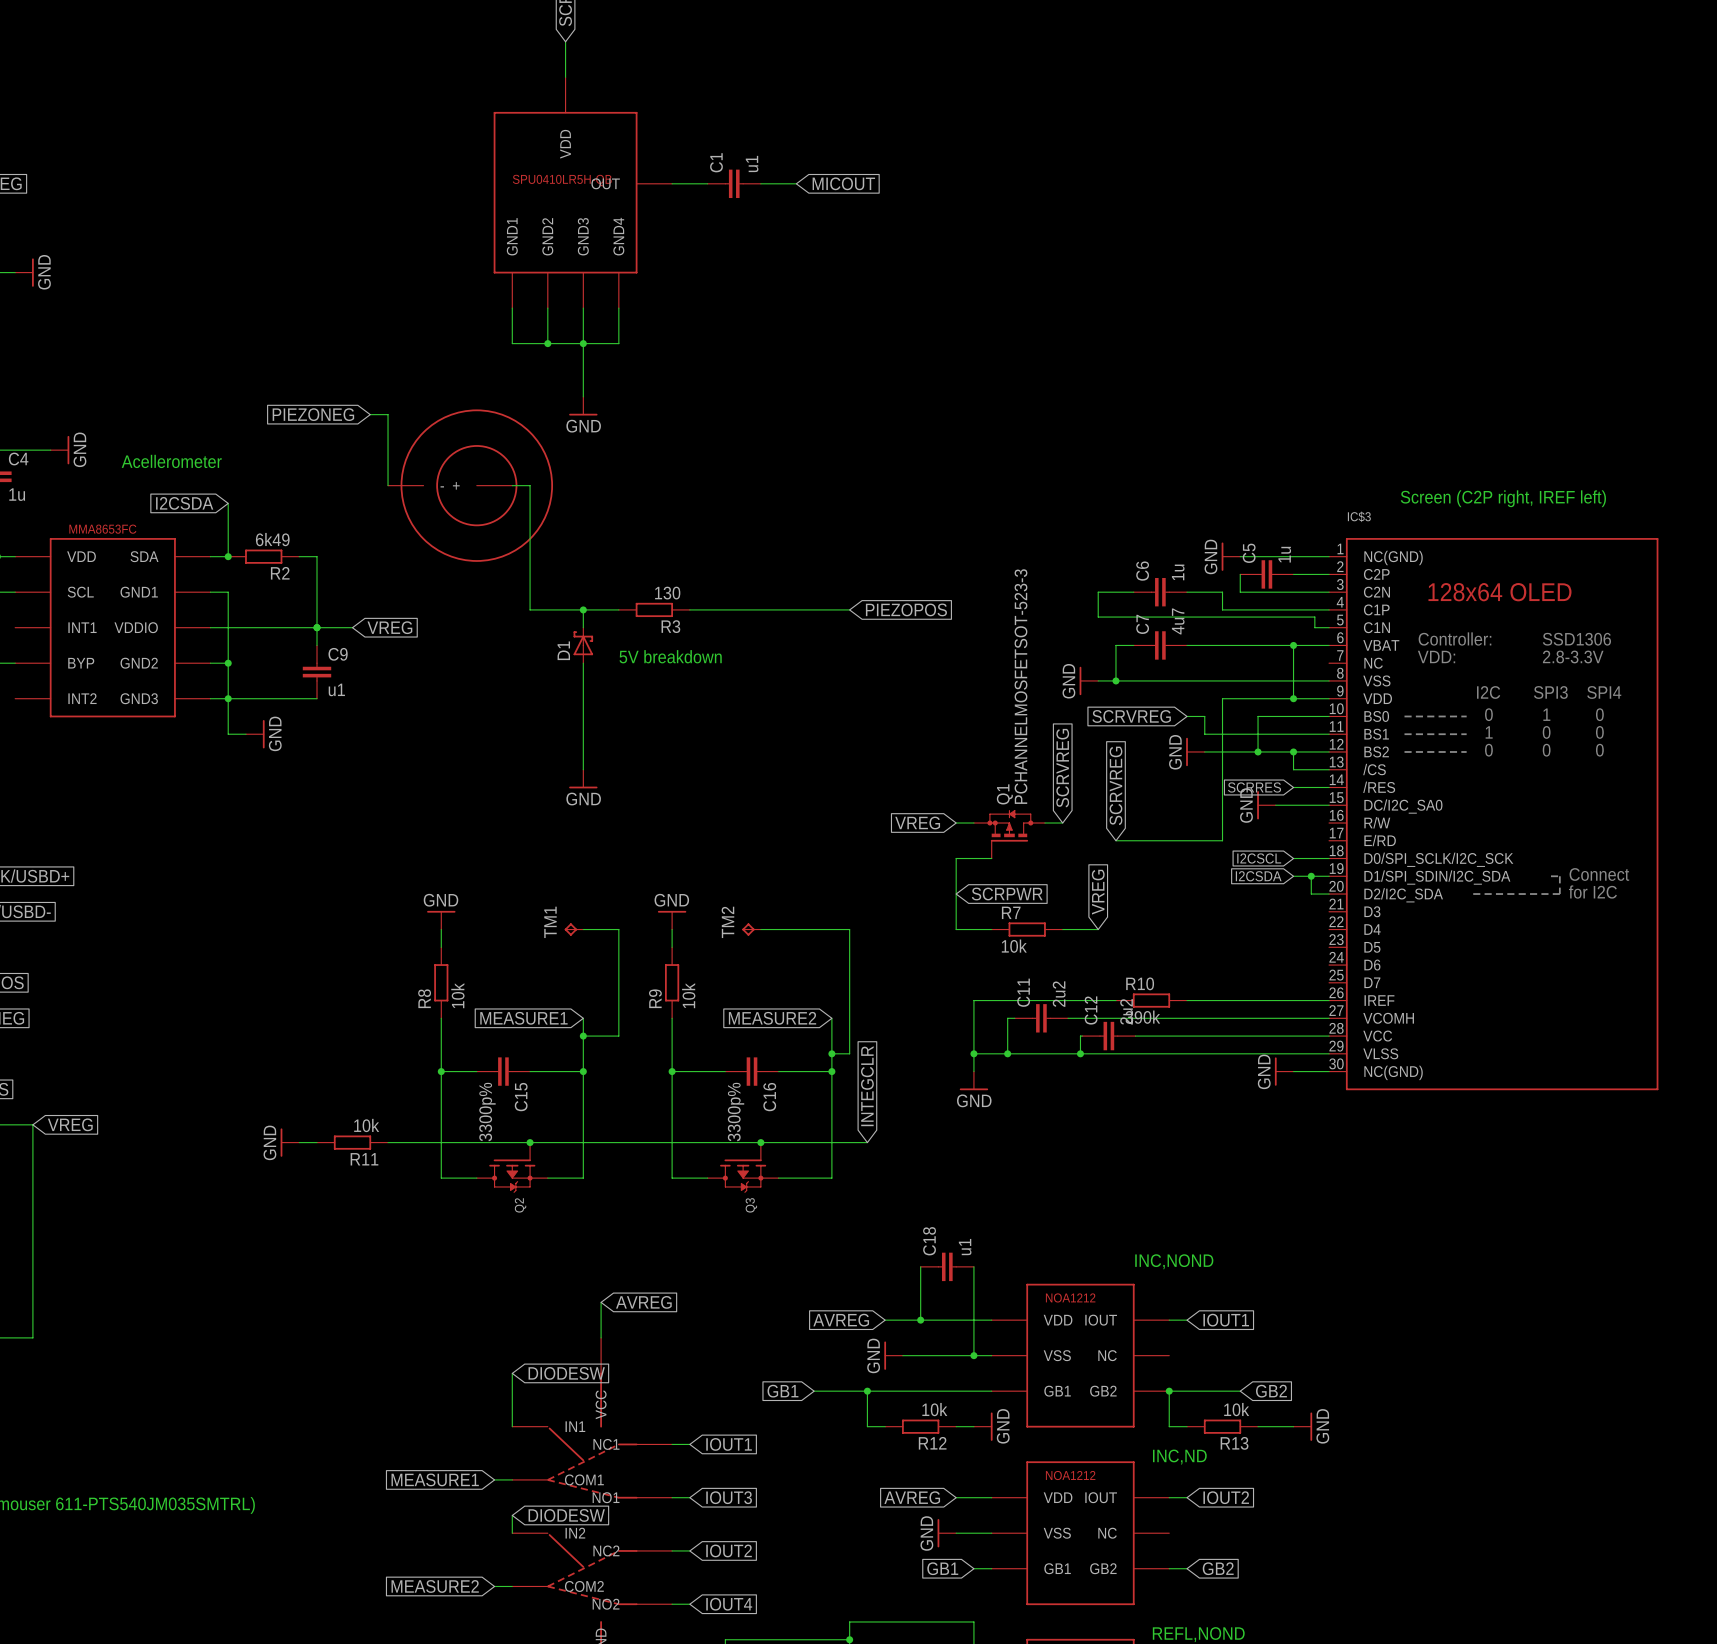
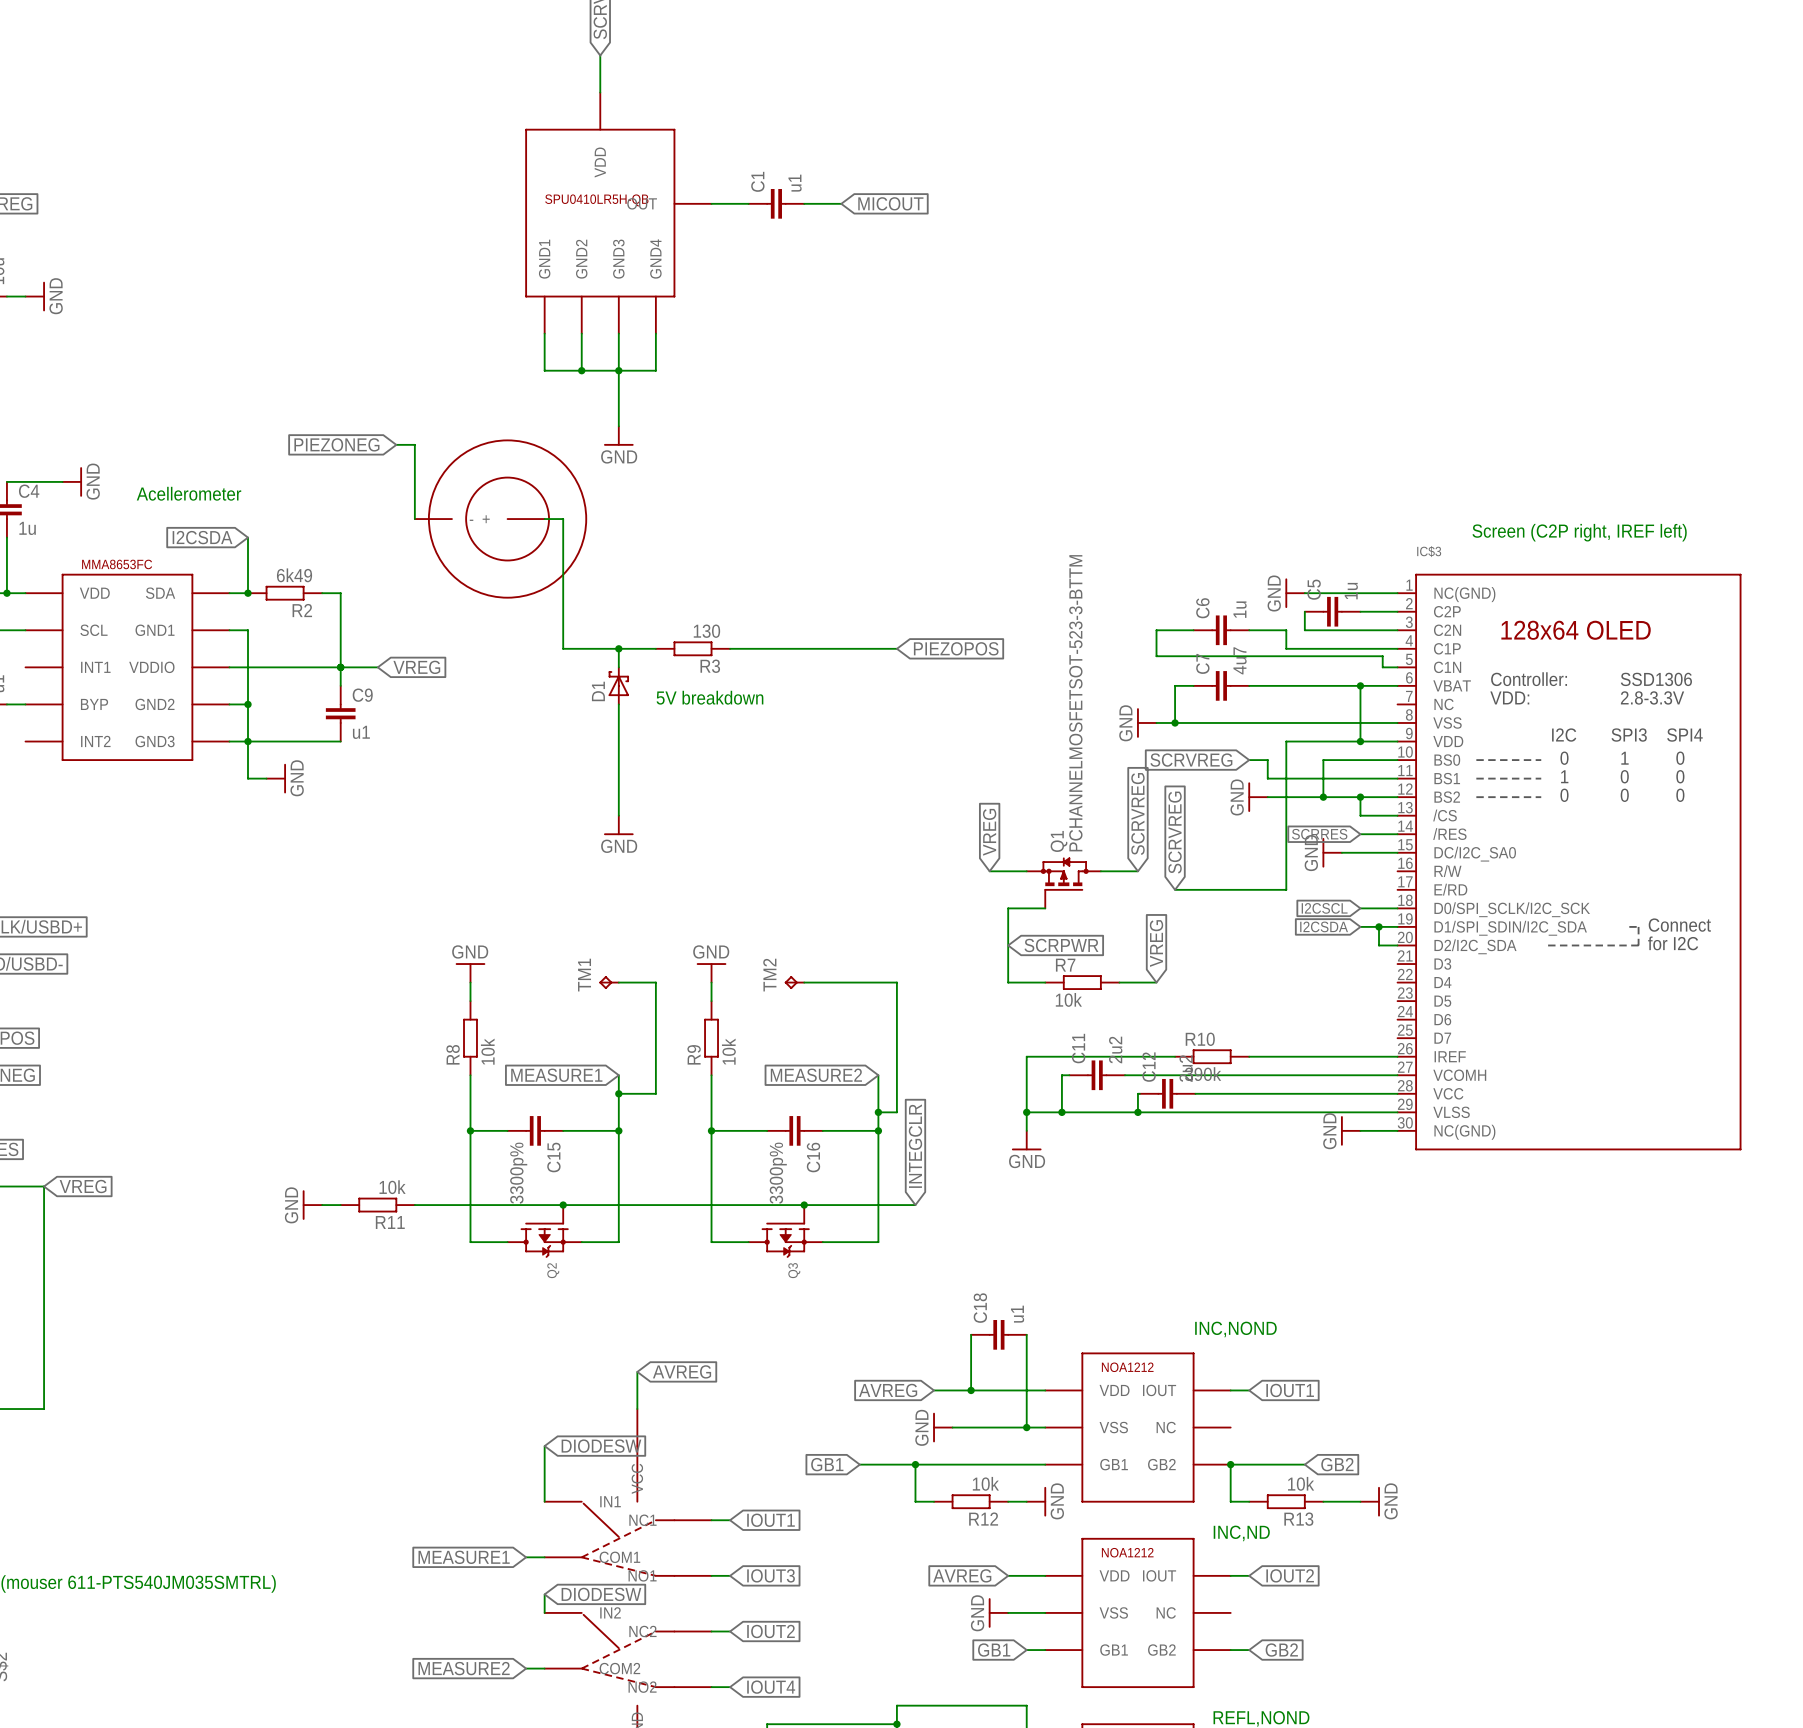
Q1 value: PCHANNELMOSFETSOT-523-3 (1020, 686) -> PCHANNELMOSFETSOT-523-3-BTTM (1075, 703)
global label position: SCRVREG (1062, 768) -> SCRVREG (1137, 814)
global label rotation: 0° (917, 823) -> 90° clockwise (989, 832)
wire: none -> (989, 871) (1008, 871)
wire: none -> (1119, 871) (1137, 871)

